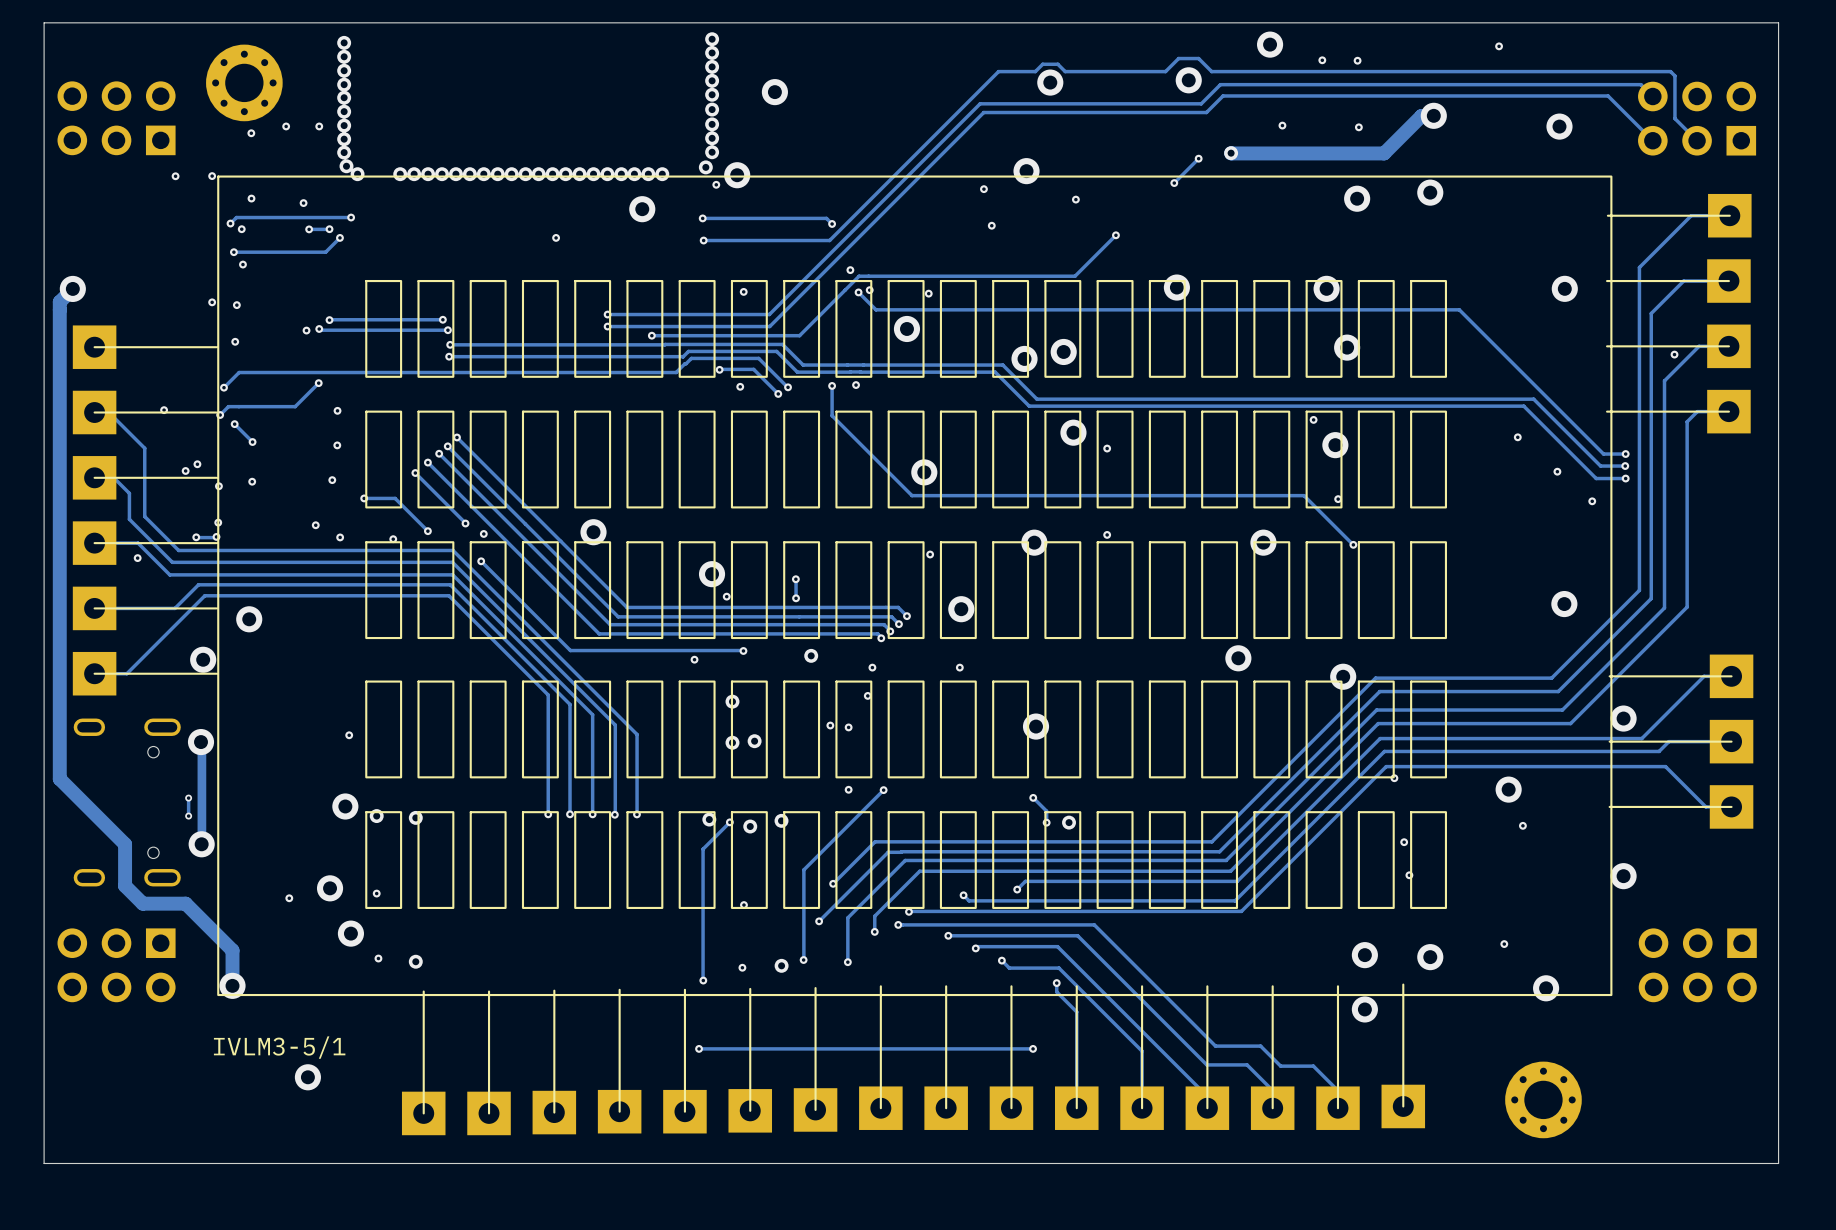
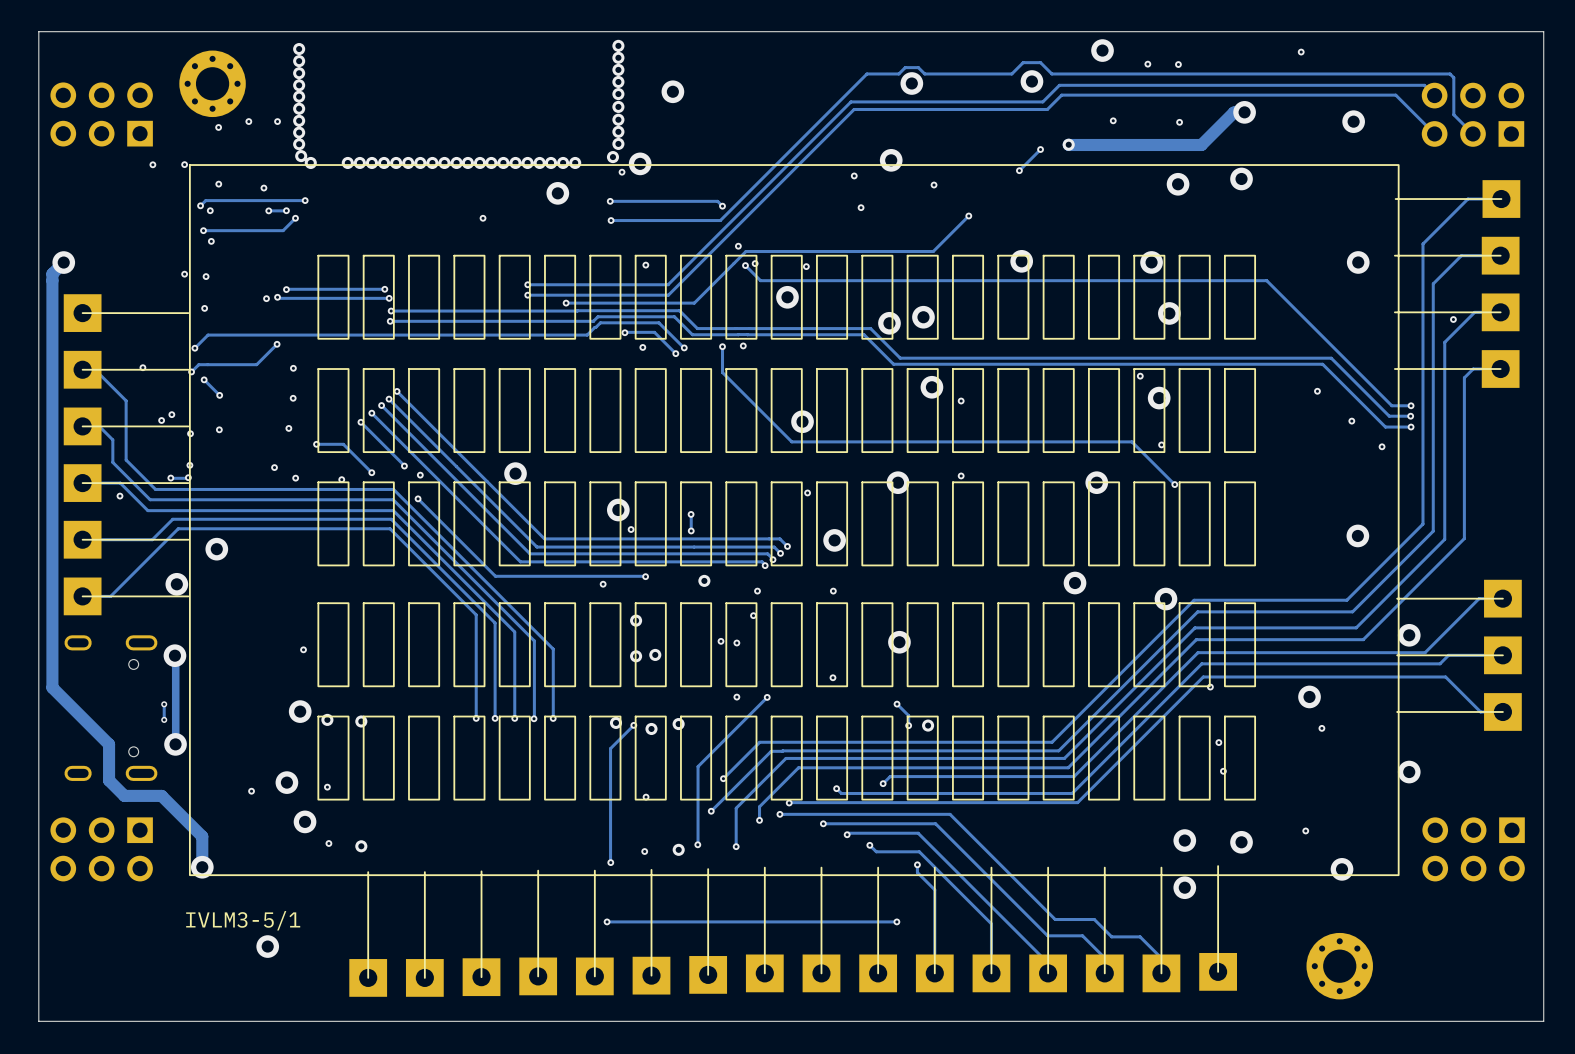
via: none -> (832, 677)

